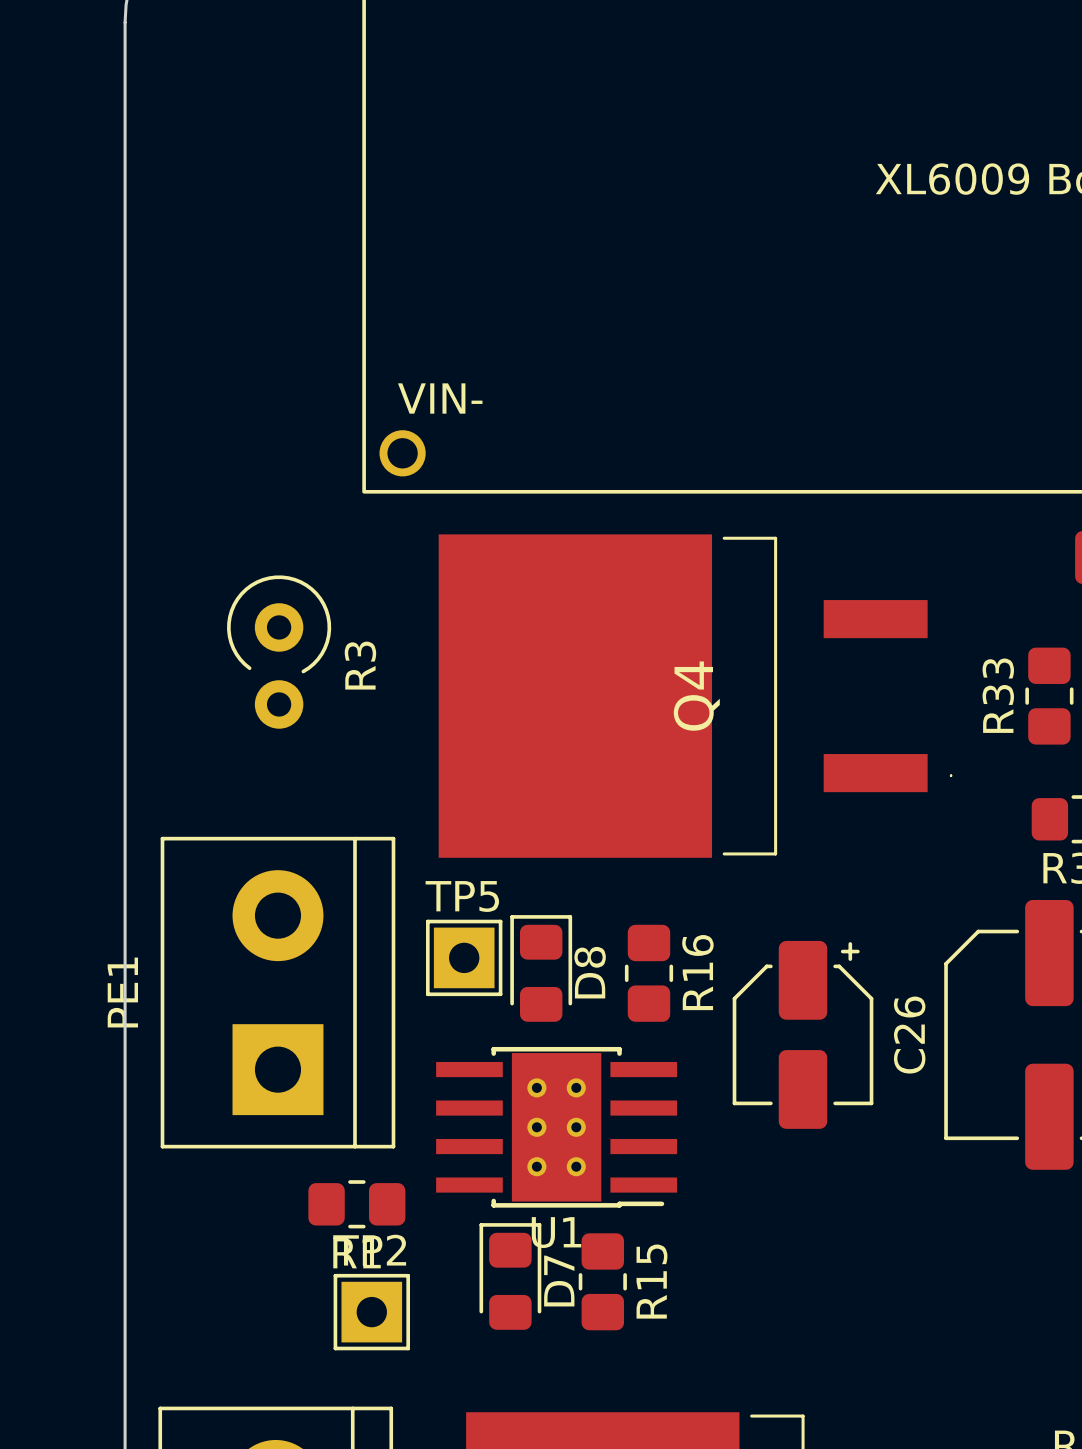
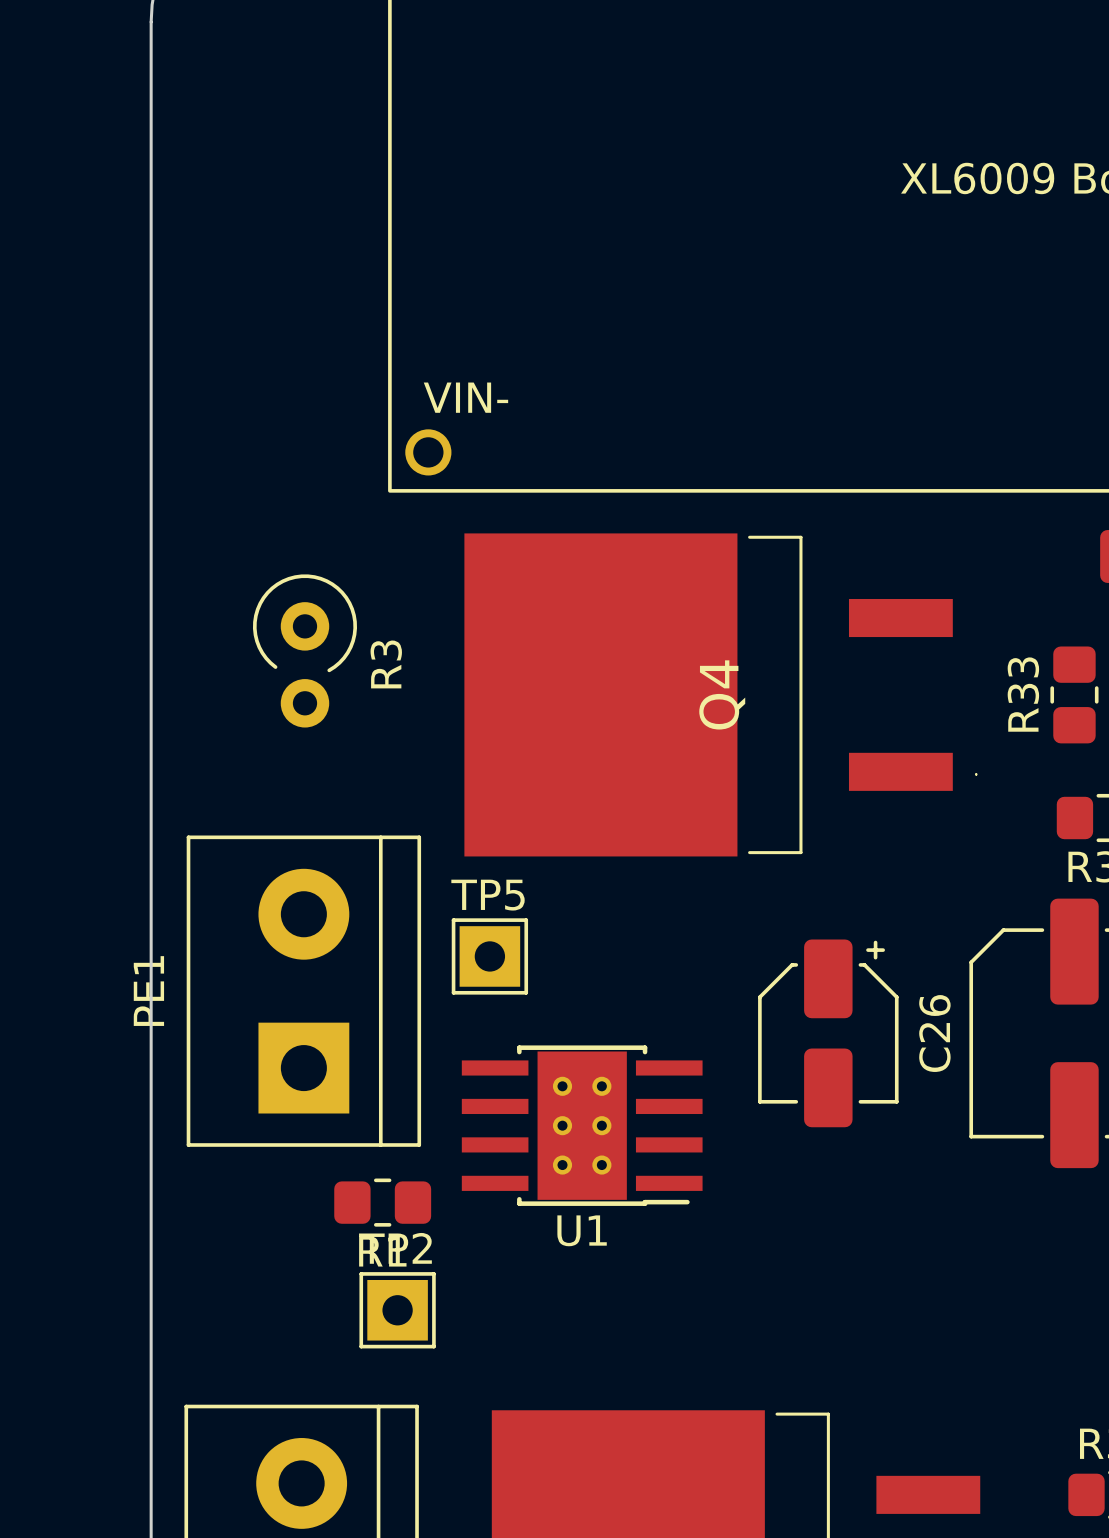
D8: (541, 968) -> none
R16: (649, 973) -> none
D7: (510, 1276) -> none
R15: (602, 1281) -> none

